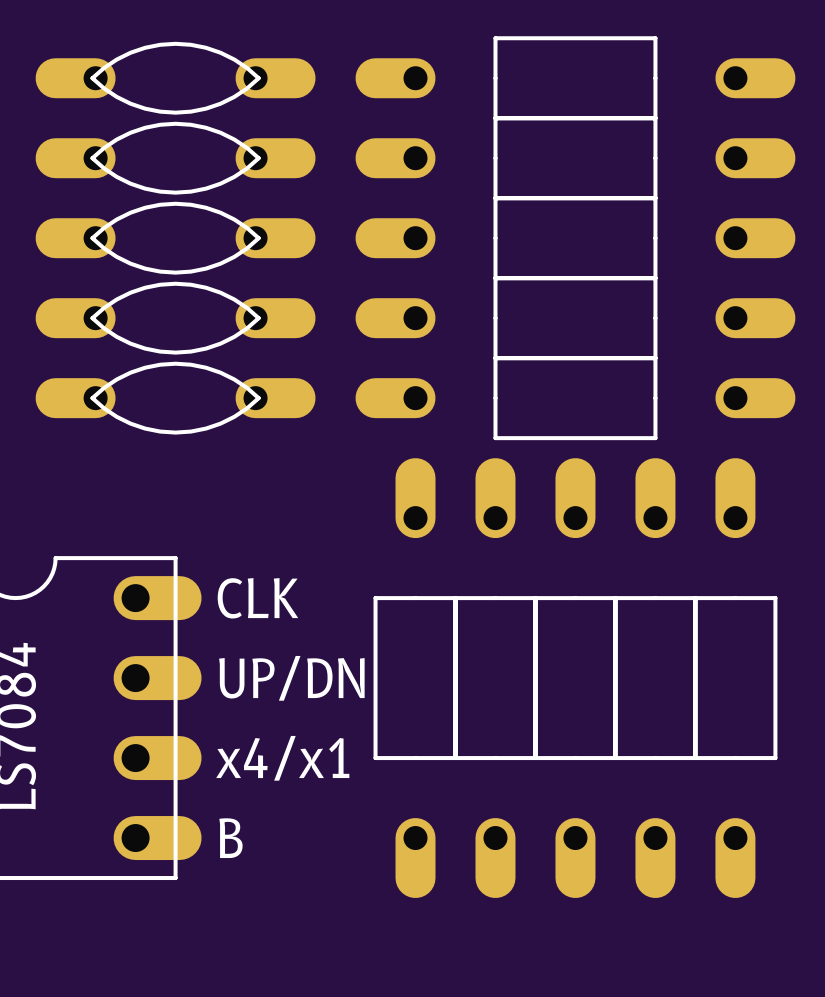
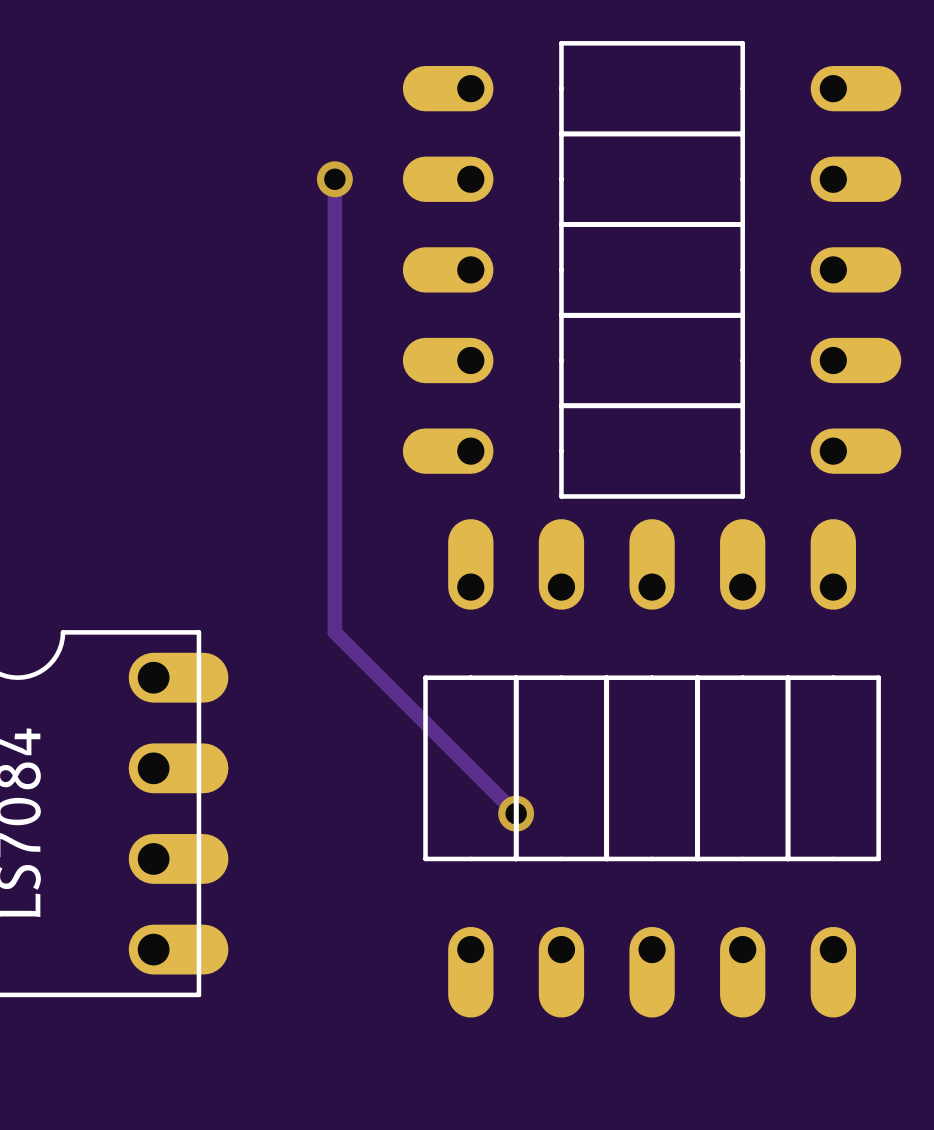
part: (175, 78) -> none
part: (175, 158) -> none
track: none -> (334, 179) (334, 632) (516, 813)
via: none -> (334, 179)
part: (175, 238) -> none
part: (175, 318) -> none
part: (175, 398) -> none
part text: CLK (257, 598) -> none
part text: UP/DN (291, 678) -> none
via: none -> (516, 813)
part text: x4/x1 (282, 758) -> none
part text: B (230, 838) -> none

